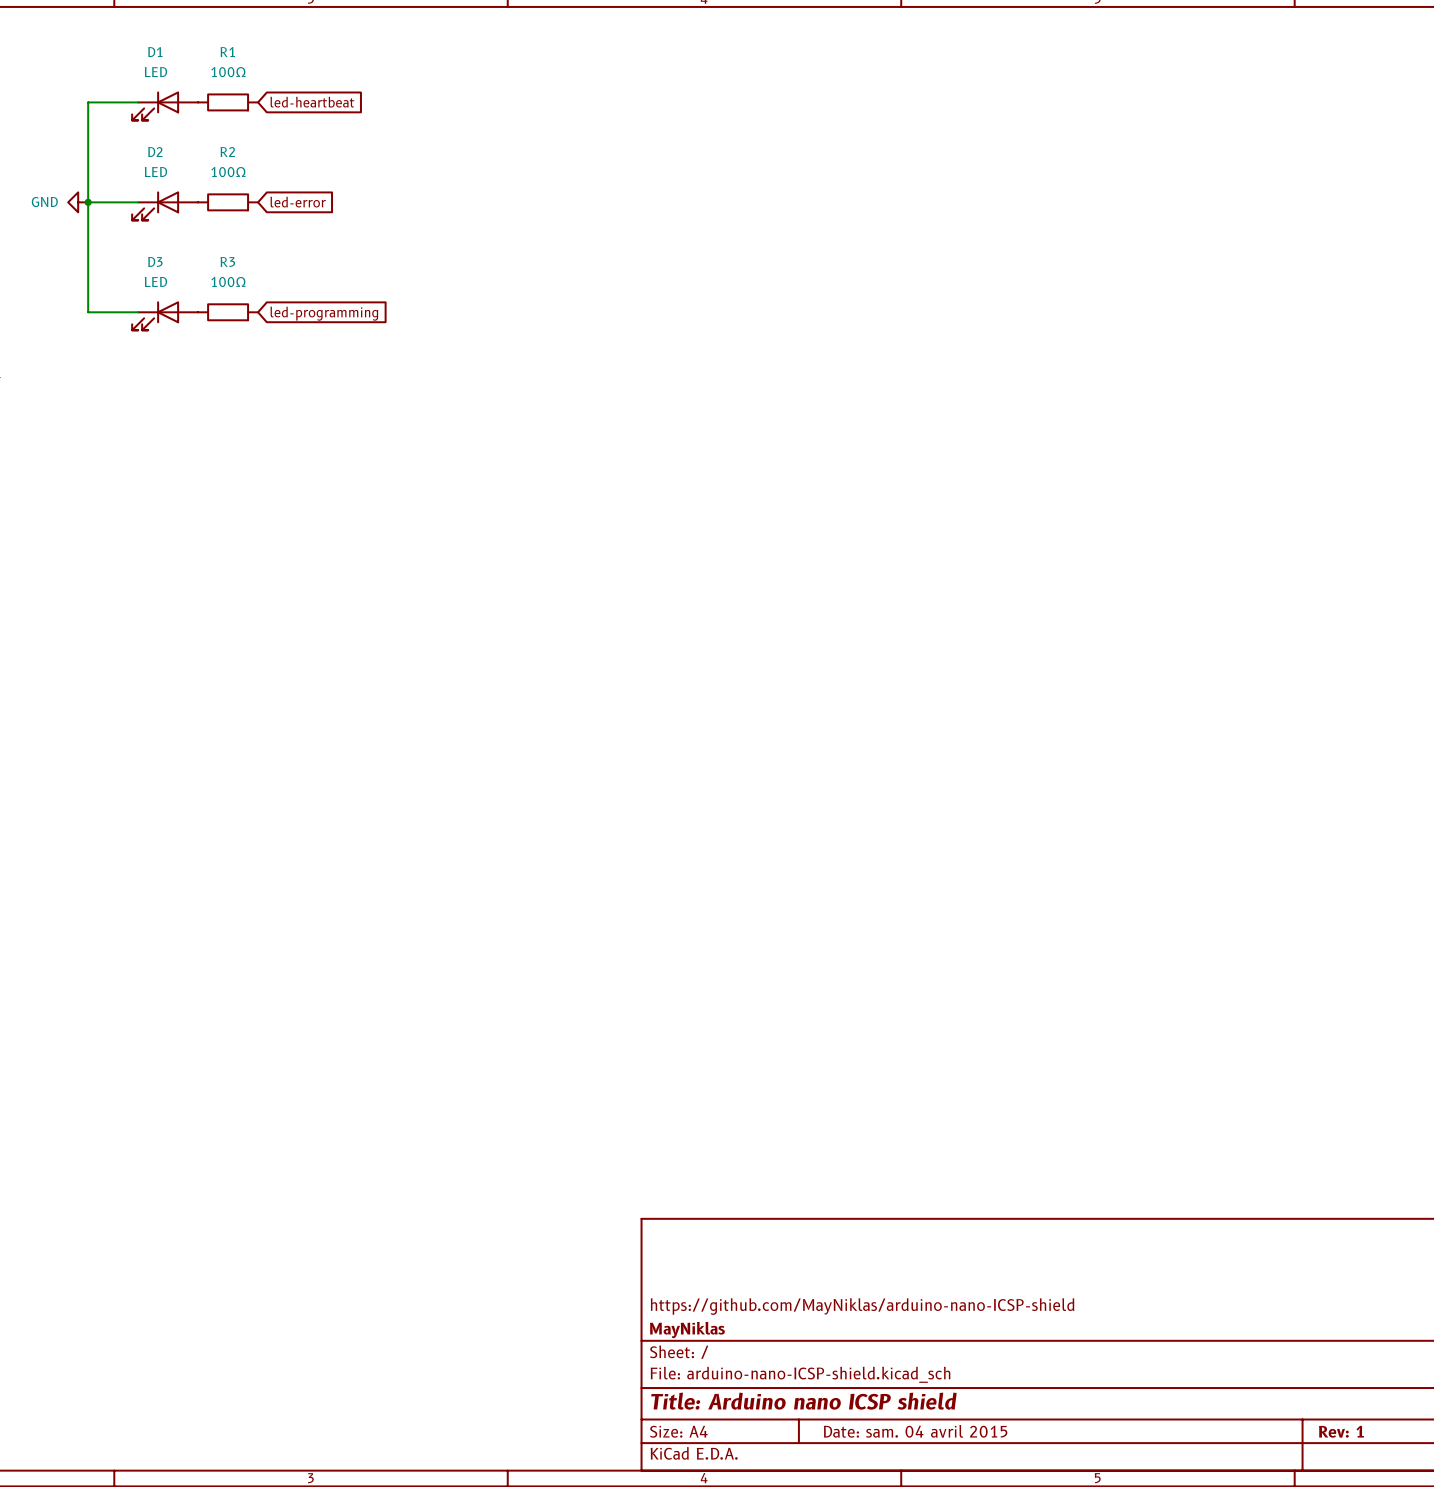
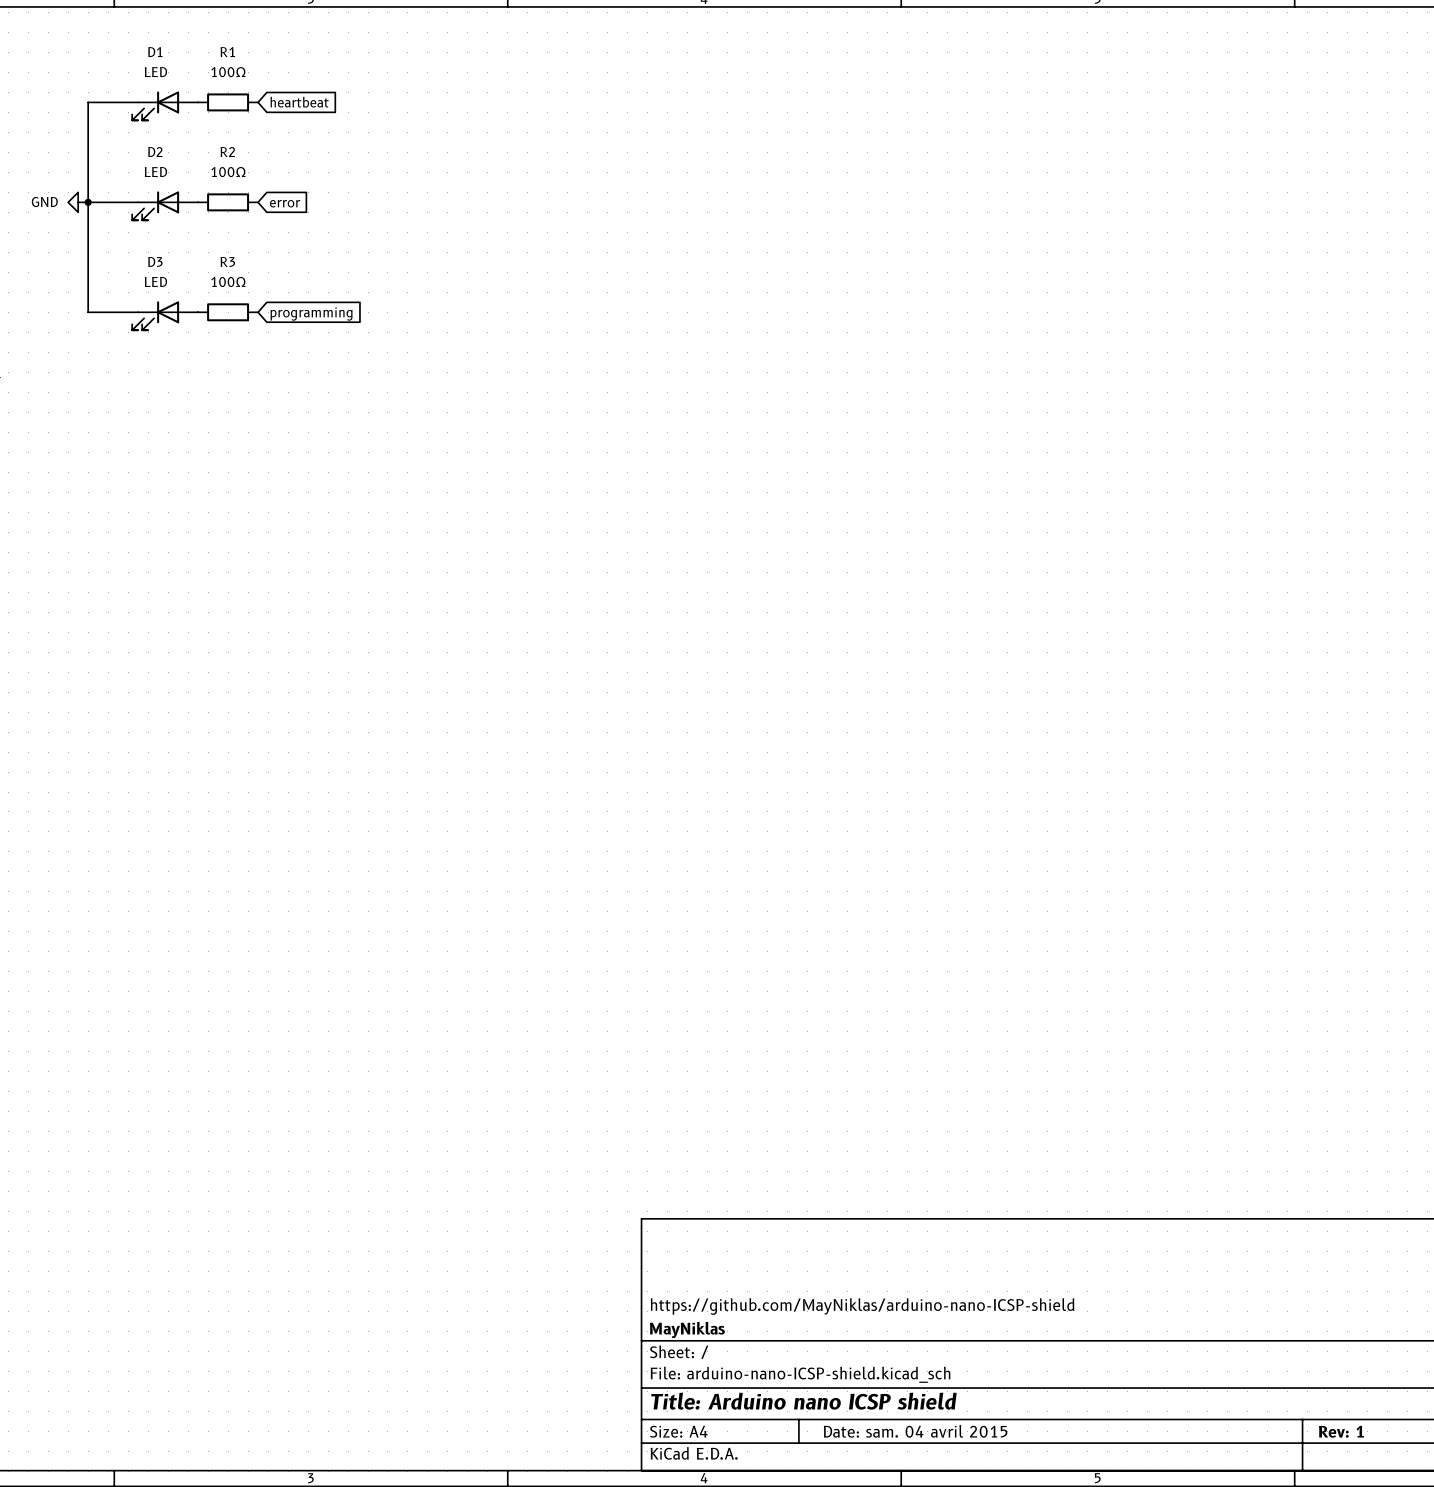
global label: led-heartbeat (312, 102) -> heartbeat (299, 102)
global label: led-error (298, 202) -> error (285, 203)
global label: led-programming (324, 313) -> programming (311, 314)

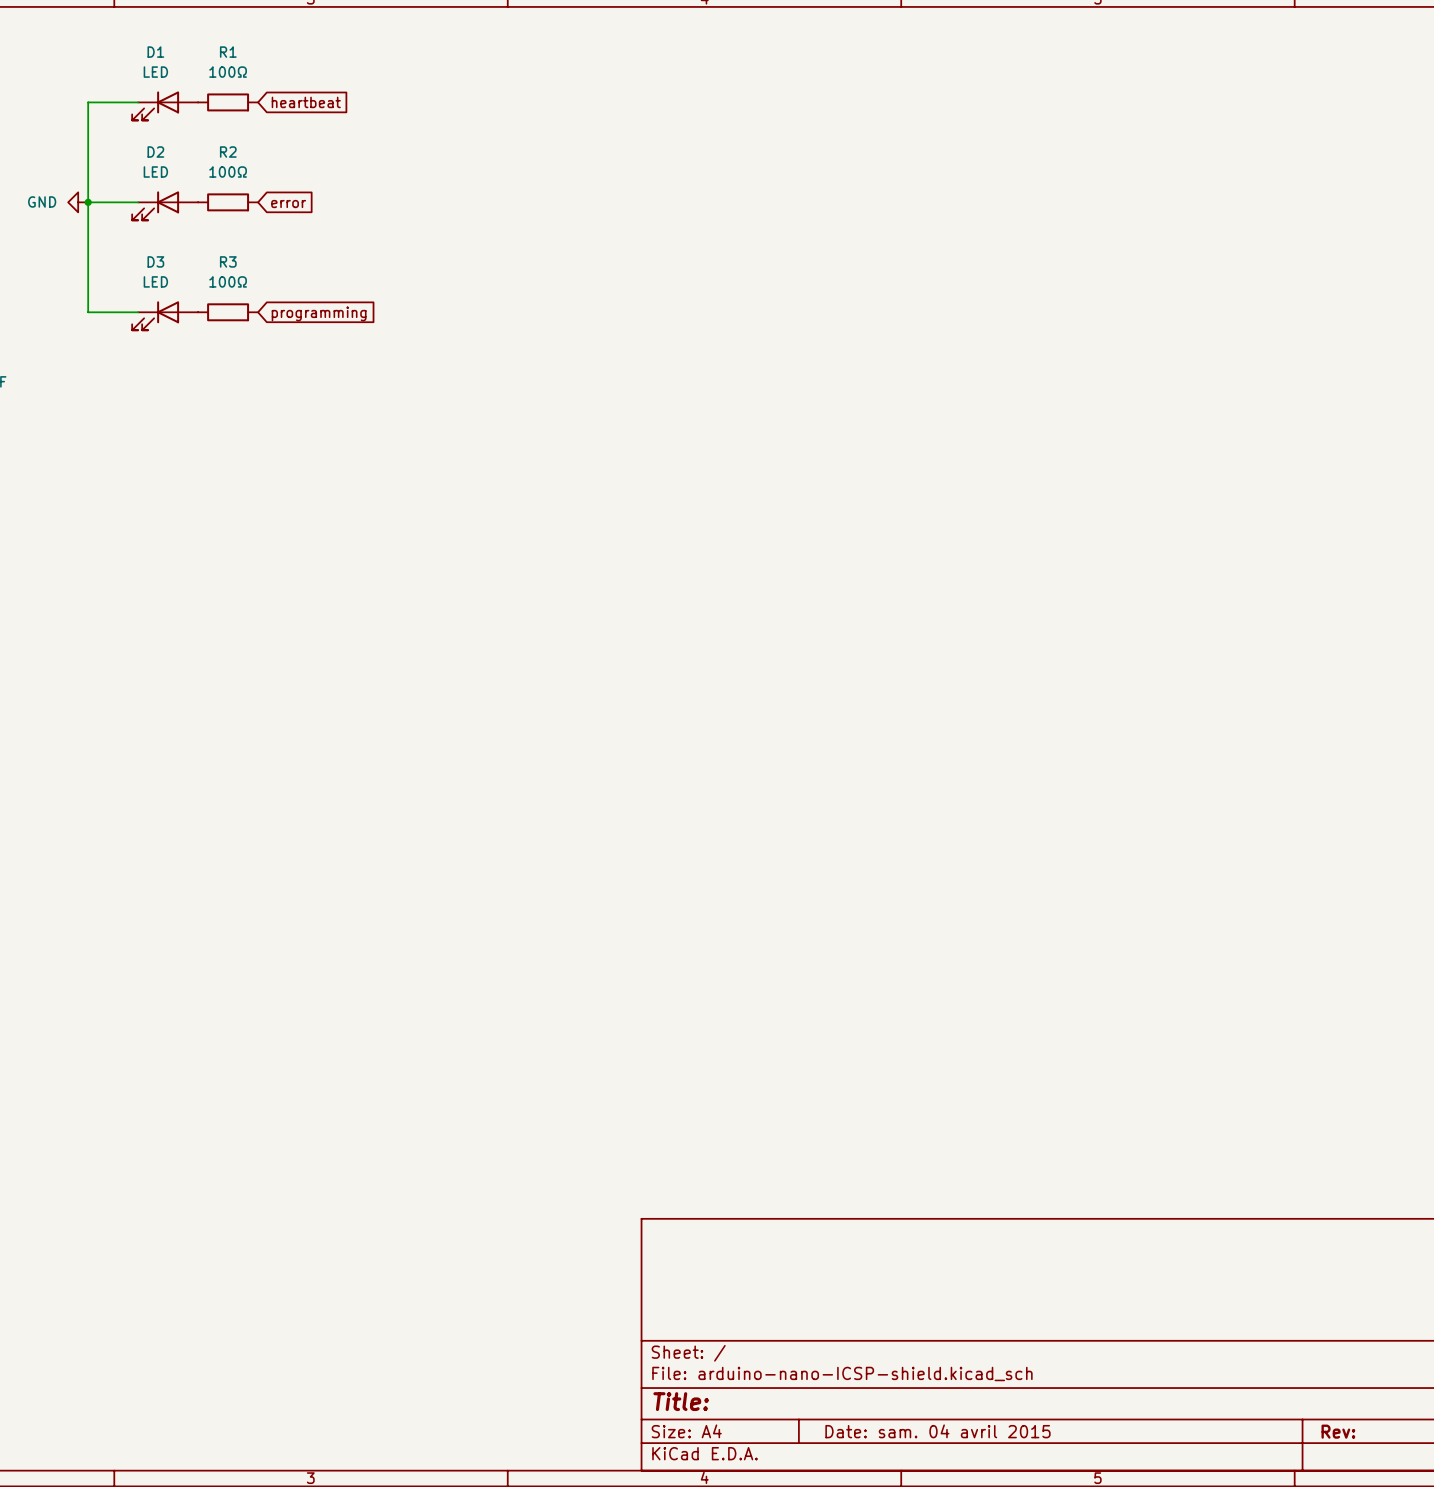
title block: https://github.com/MayNiklas/arduino-nano-ICSP-shield (862, 1306) -> none
title block: MayNiklas (687, 1330) -> none
title block: Title: Arduino nano ICSP shield (803, 1401) -> Title: (681, 1401)
title block: Rev: 1 (1341, 1431) -> Rev: (1338, 1431)

